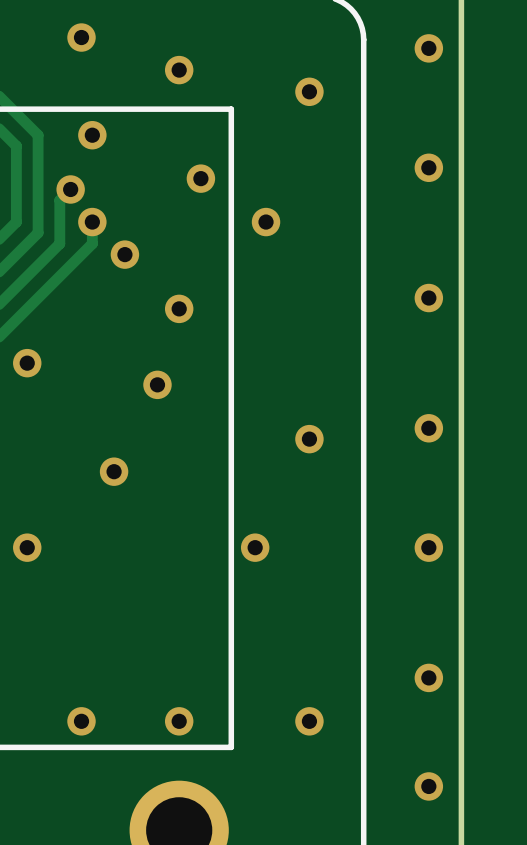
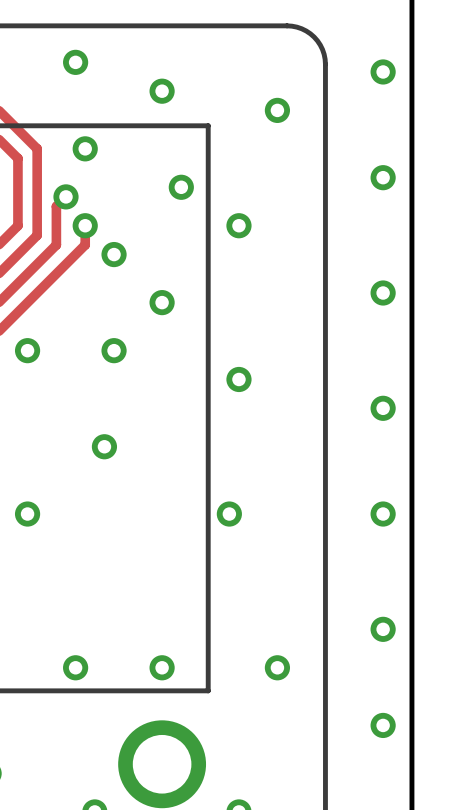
via position: (157, 384) -> (114, 350)
via: none -> (238, 379)
via: (309, 439) -> none

